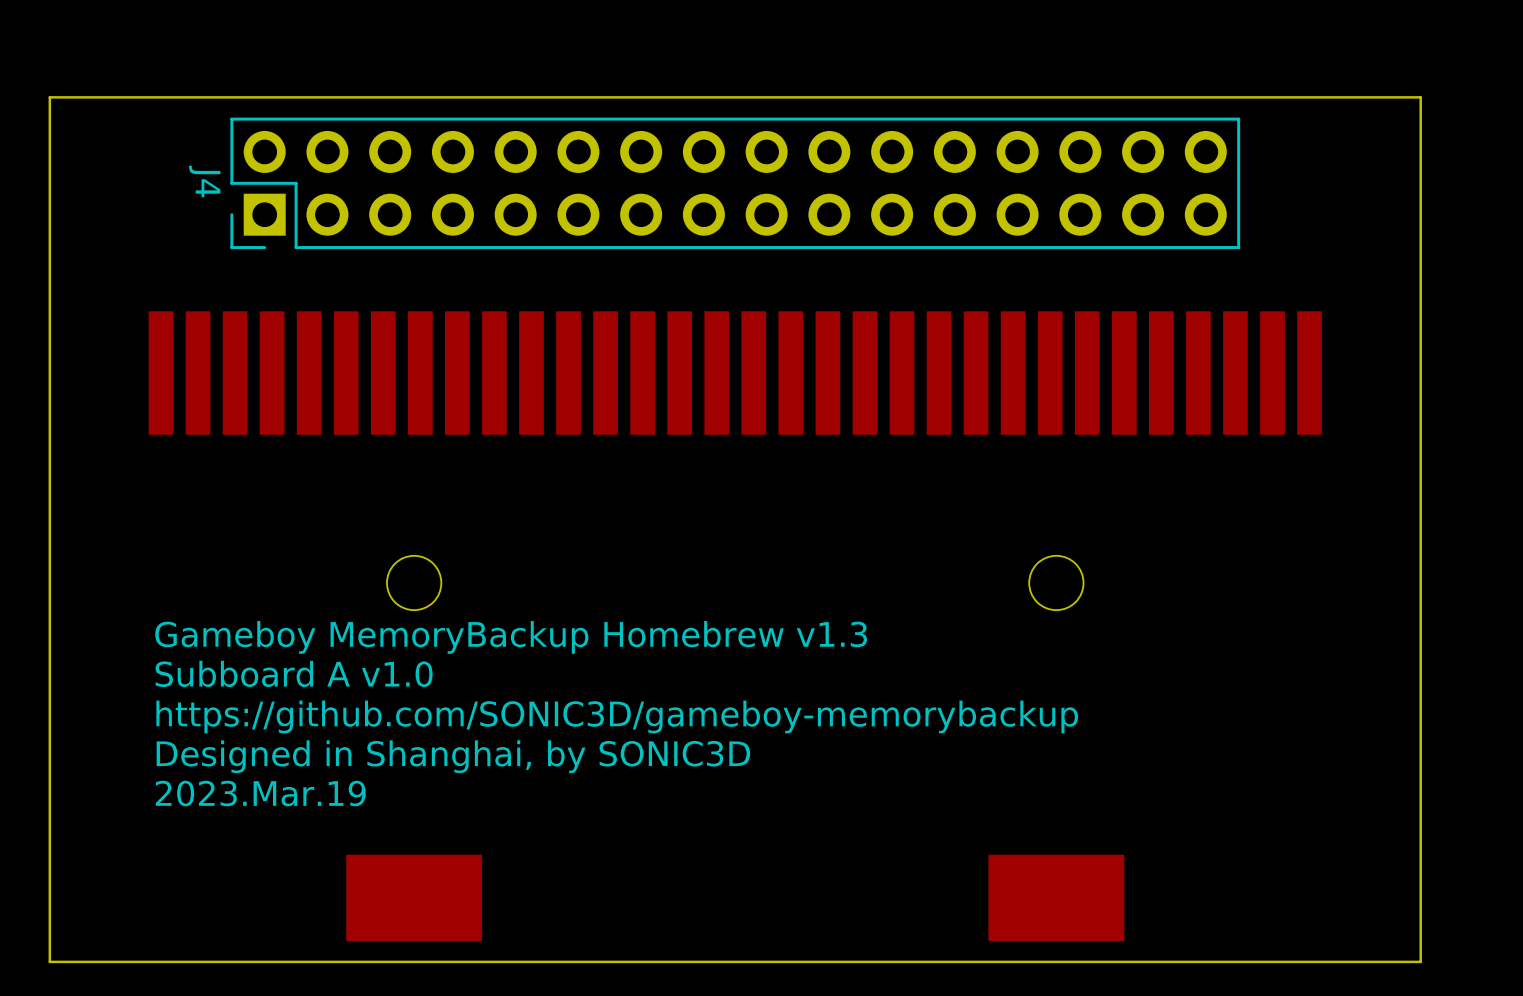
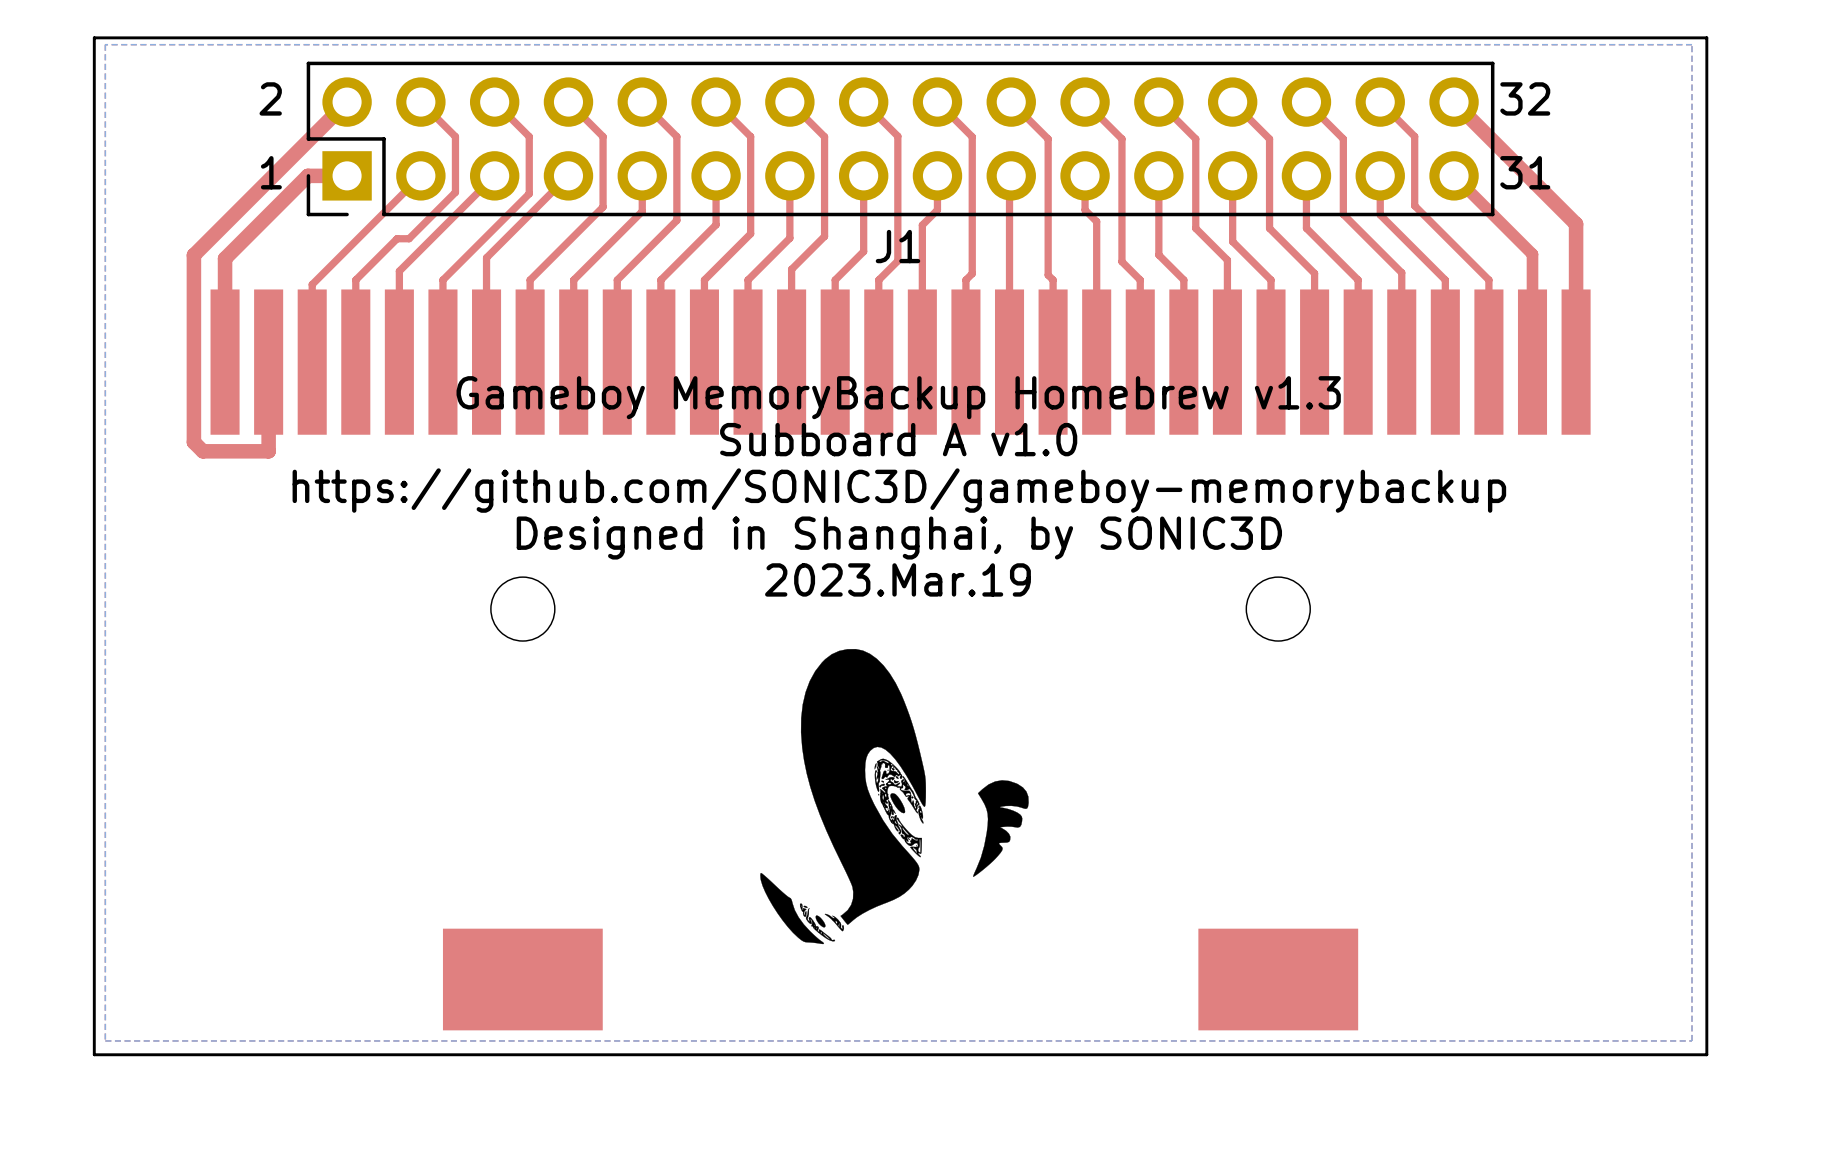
bottom zone outline: none -> (1692, 44) (1692, 1040) (105, 1040) (105, 44) (1692, 44)
text: none -> 2 (270, 98)
text: none -> 32 (1525, 98)
top track: none -> (347, 102) (193, 255) (193, 442) (202, 451) (268, 451) (268, 362)
top track: none -> (420, 102) (455, 136) (455, 192) (409, 238) (397, 238) (355, 280) (355, 362)
top track: none -> (494, 102) (529, 136) (529, 193) (442, 280) (442, 362)
top track: none -> (568, 102) (603, 136) (603, 207) (530, 280) (530, 362)
top track: none -> (642, 102) (676, 136) (676, 220) (617, 280) (617, 362)
top track: none -> (716, 102) (750, 136) (750, 233) (704, 280) (704, 362)
top track: none -> (789, 102) (824, 136) (824, 236) (791, 269) (791, 362)
top track: none -> (863, 102) (897, 136) (897, 260) (878, 280) (878, 362)
top track: none -> (937, 102) (972, 136) (972, 273) (965, 280) (965, 362)
top track: none -> (1011, 102) (1048, 138) (1048, 275) (1053, 280) (1053, 362)
top track: none -> (1085, 102) (1121, 138) (1121, 261) (1140, 280) (1140, 362)
top track: none -> (1158, 102) (1195, 138) (1195, 228) (1227, 260) (1227, 362)
top track: none -> (1232, 102) (1269, 138) (1269, 228) (1314, 273) (1314, 362)
top track: none -> (1306, 102) (1343, 138) (1343, 214) (1401, 272) (1401, 362)
top track: none -> (1380, 102) (1414, 136) (1414, 205) (1488, 280) (1488, 362)
top track: none -> (1454, 102) (1576, 224) (1576, 362)
J4 name: J4 (204, 181) -> J1 (897, 246)
text: none -> 1 (271, 172)
text: none -> 31 (1525, 172)
top track: none -> (347, 175) (307, 175) (225, 258) (225, 362)
top track: none -> (420, 175) (312, 284) (312, 362)
top track: none -> (494, 175) (399, 271) (399, 362)
top track: none -> (568, 175) (486, 257) (486, 362)
top track: none -> (642, 175) (642, 211) (573, 280) (573, 362)
top track: none -> (716, 175) (716, 224) (660, 280) (660, 362)
top track: none -> (789, 175) (789, 238) (748, 280) (748, 362)
top track: none -> (863, 175) (863, 251) (835, 280) (835, 362)
top track: none -> (937, 175) (937, 210) (922, 225) (922, 362)
top track: none -> (1011, 175) (1009, 177) (1009, 362)
top track: none -> (1085, 175) (1085, 210) (1096, 221) (1096, 362)
top track: none -> (1158, 175) (1158, 255) (1183, 280) (1183, 362)
top track: none -> (1232, 175) (1232, 241) (1271, 280) (1271, 362)
top track: none -> (1306, 175) (1306, 228) (1358, 280) (1358, 362)
top track: none -> (1380, 175) (1380, 214) (1445, 280) (1445, 362)
top track: none -> (1454, 175) (1532, 254) (1532, 362)
text: none -> Gameboy MemoryBackup Homebrew v1.3 (898, 397)
text: none -> Subboard A v1.0 (898, 439)
text: none -> https://github.com/SONIC3D/gameboy-memorybackup (899, 490)
text: none -> Designed in Shanghai, by SONIC3D (899, 538)
text: none -> 2023.Mar.19 (897, 579)
drawing: none -> [760, 649, 1029, 945]
text: Gameboy MemoryBackup Homebrew v1.3 (511, 637) -> none
text: Subboard A v1.0 (294, 673) -> none
text: https://github.com/SONIC3D/gameboy-memorybackup (617, 716) -> none
text: Designed in Shanghai, by SONIC3D (453, 756) -> none
text: 2023.Mar.19 (260, 793) -> none

